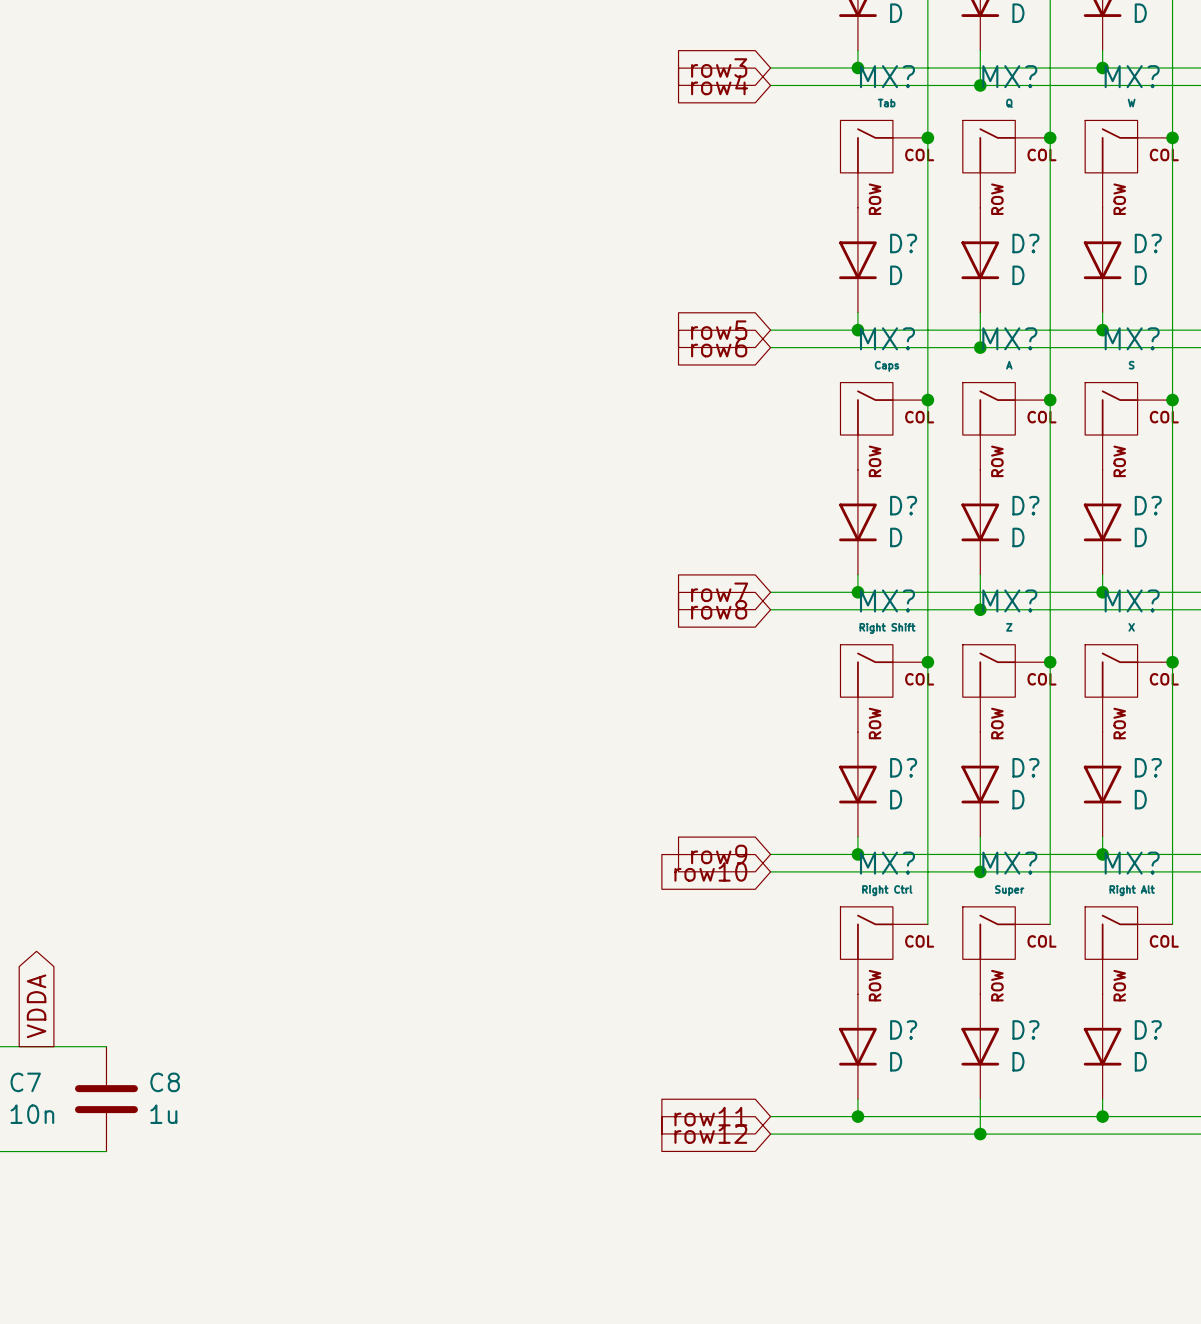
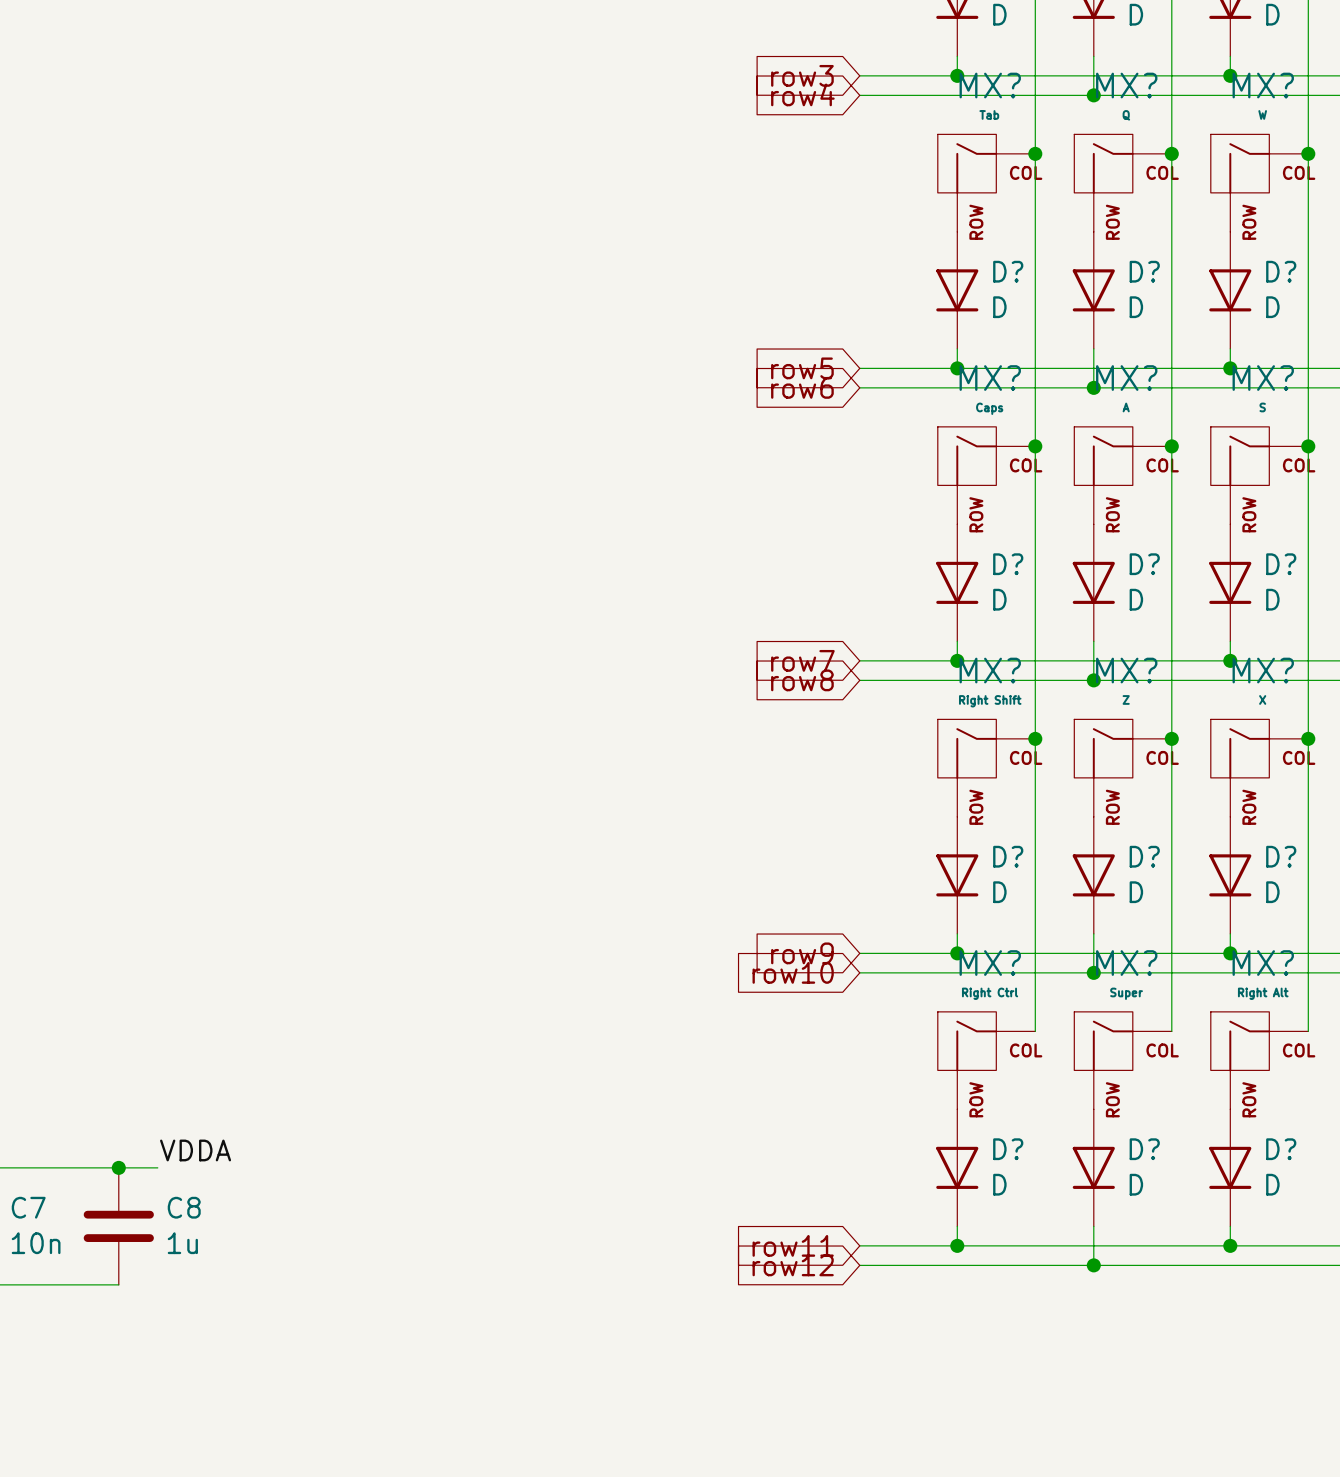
global label: VDDA (36, 1006) -> none
label: none -> VDDA (195, 1150)
wire: none -> (118, 1167) (157, 1167)
junction: none -> (118, 1167)

